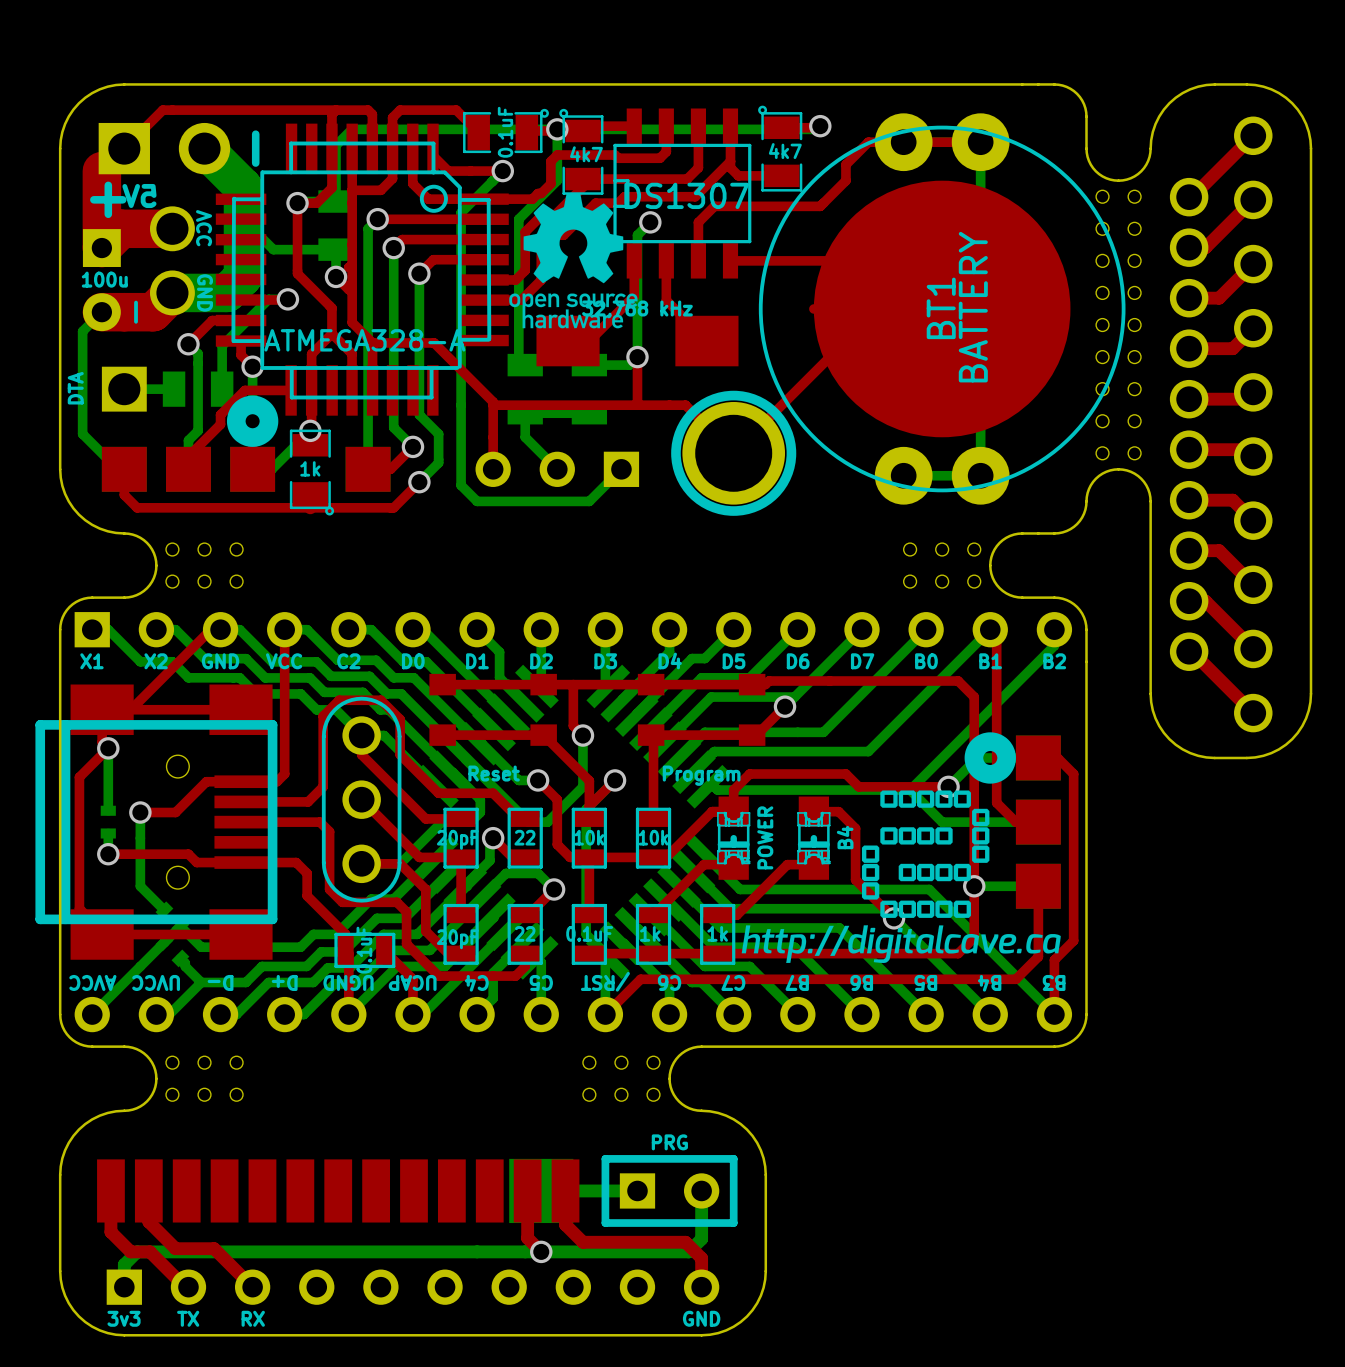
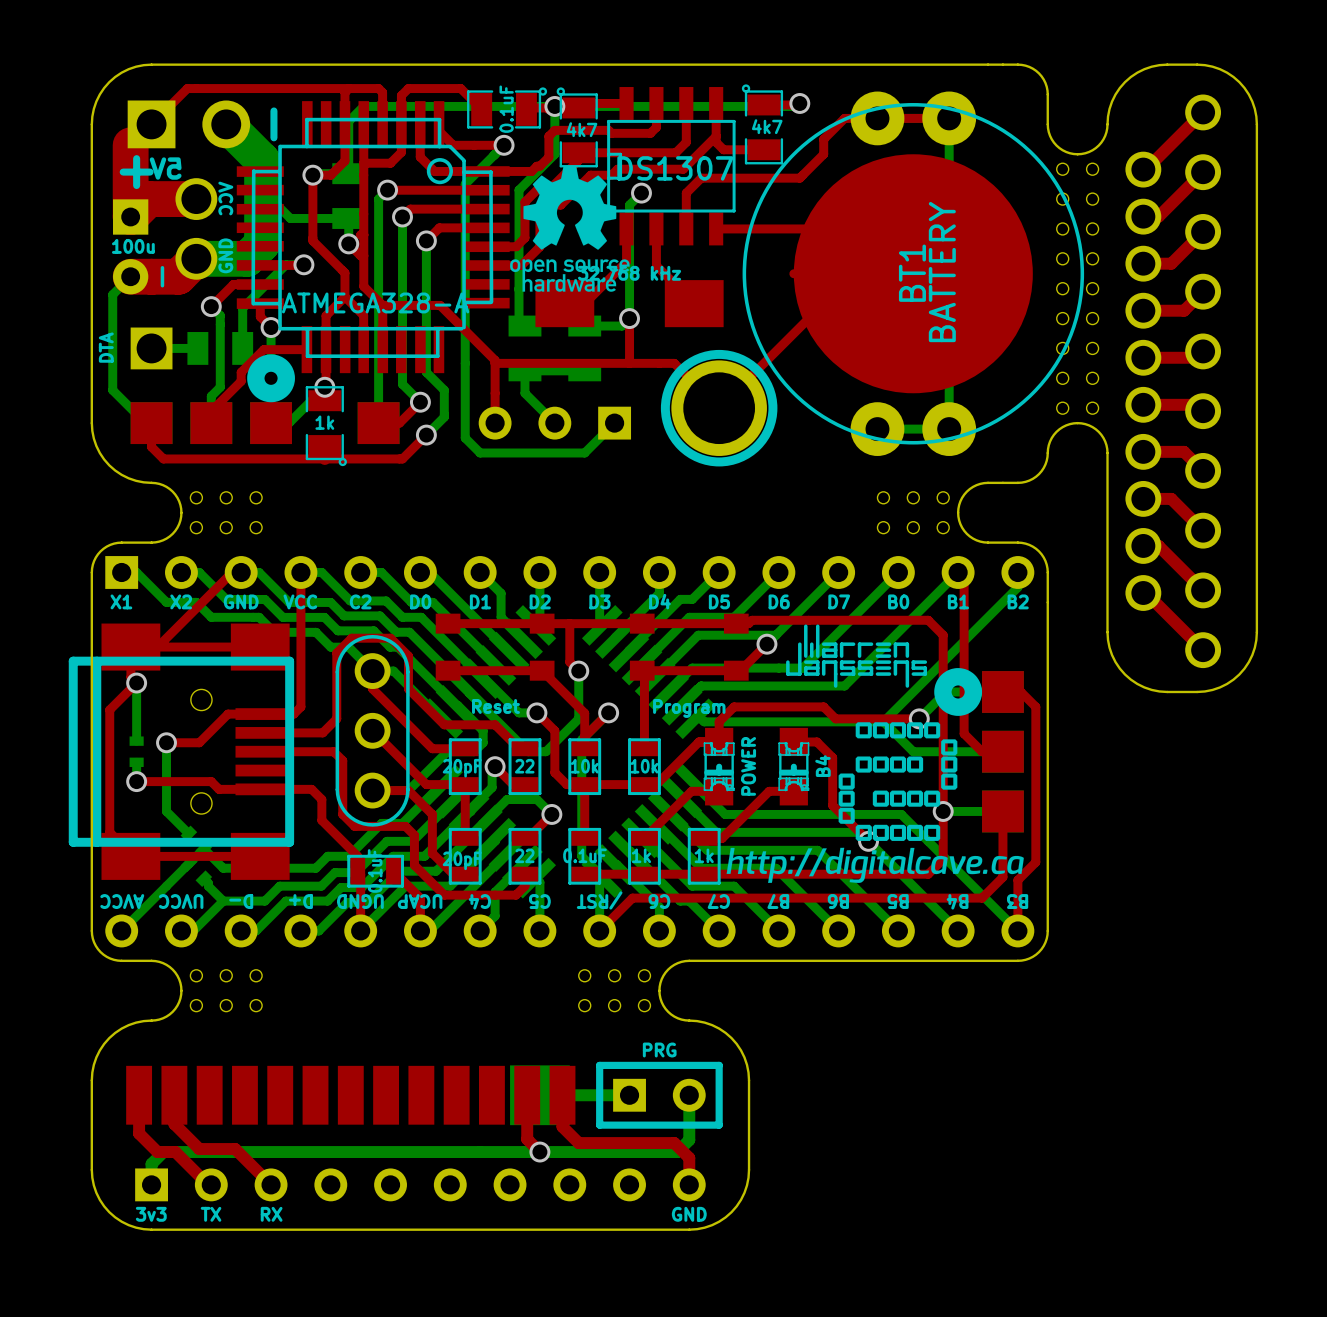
text rotation: 0° (204, 292) -> 180° (225, 255)
drawing: none -> [786, 624, 928, 688]

